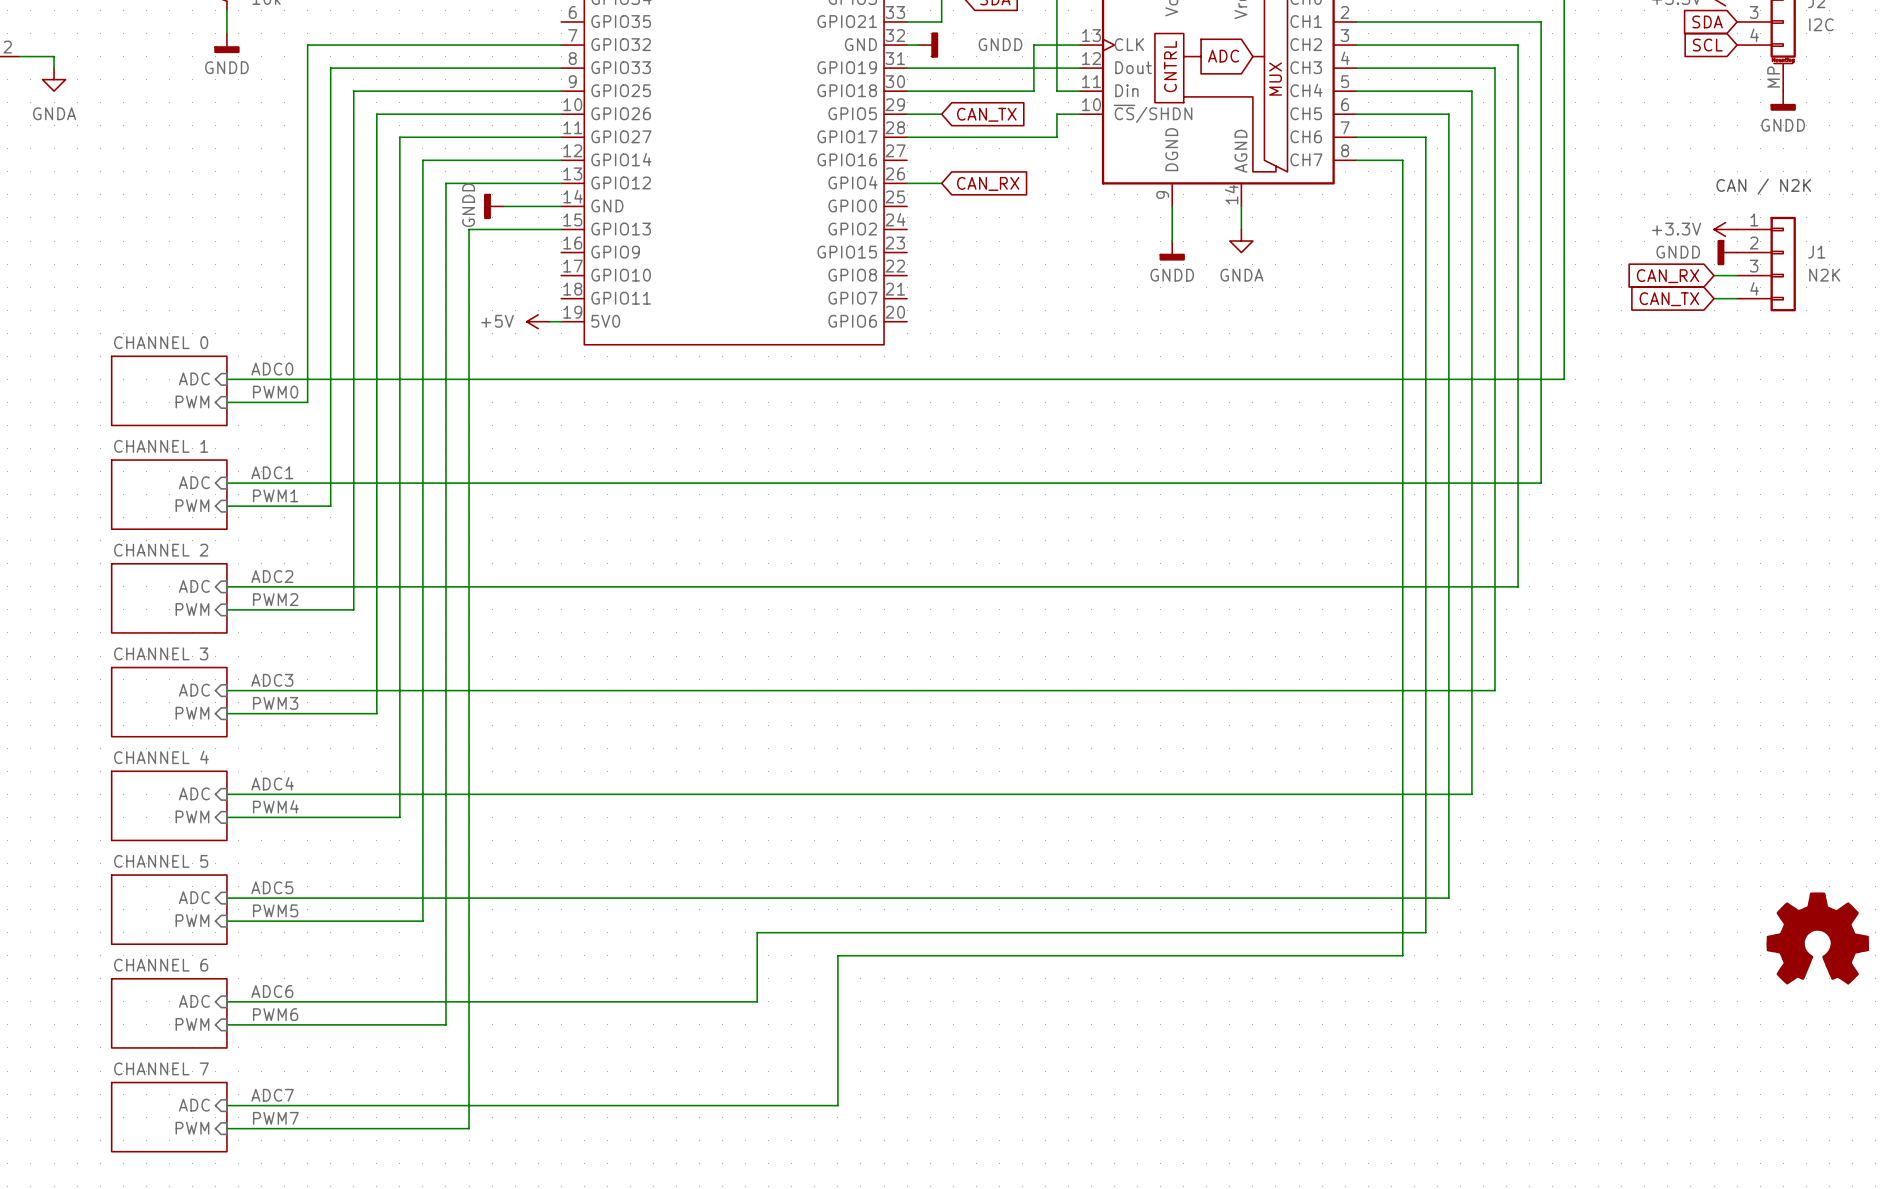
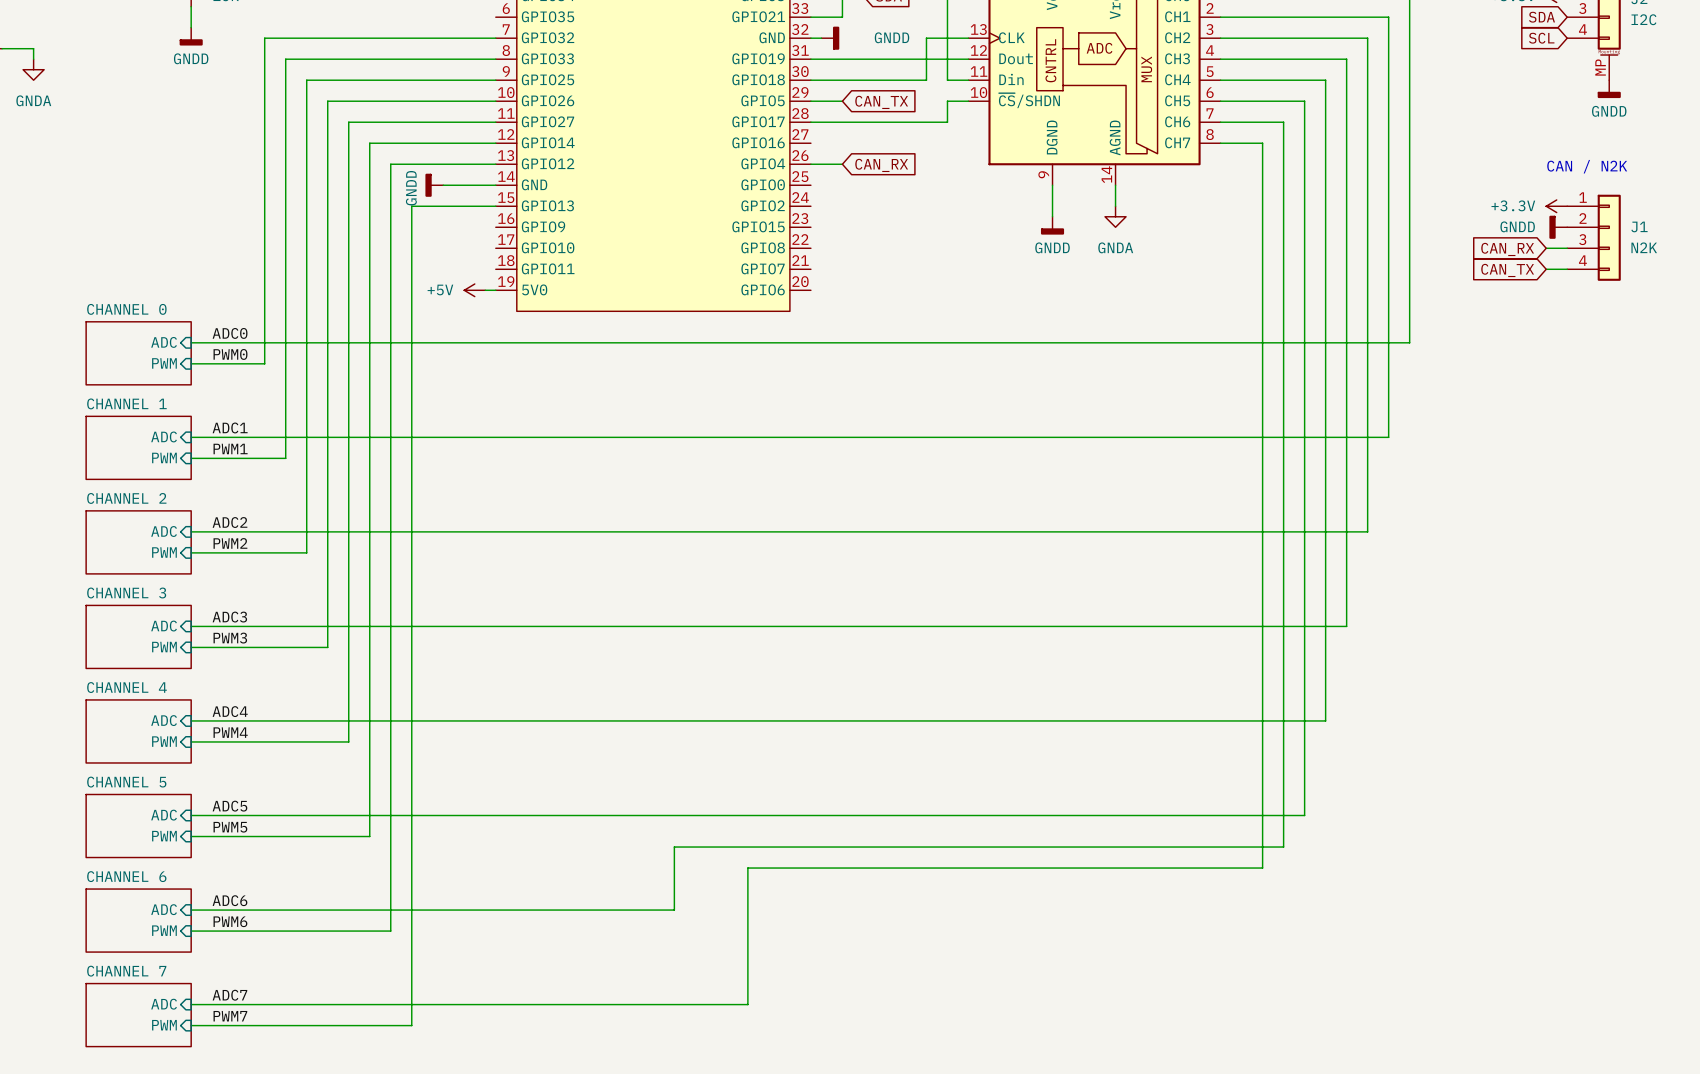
power symbol: (1817, 938) -> none

